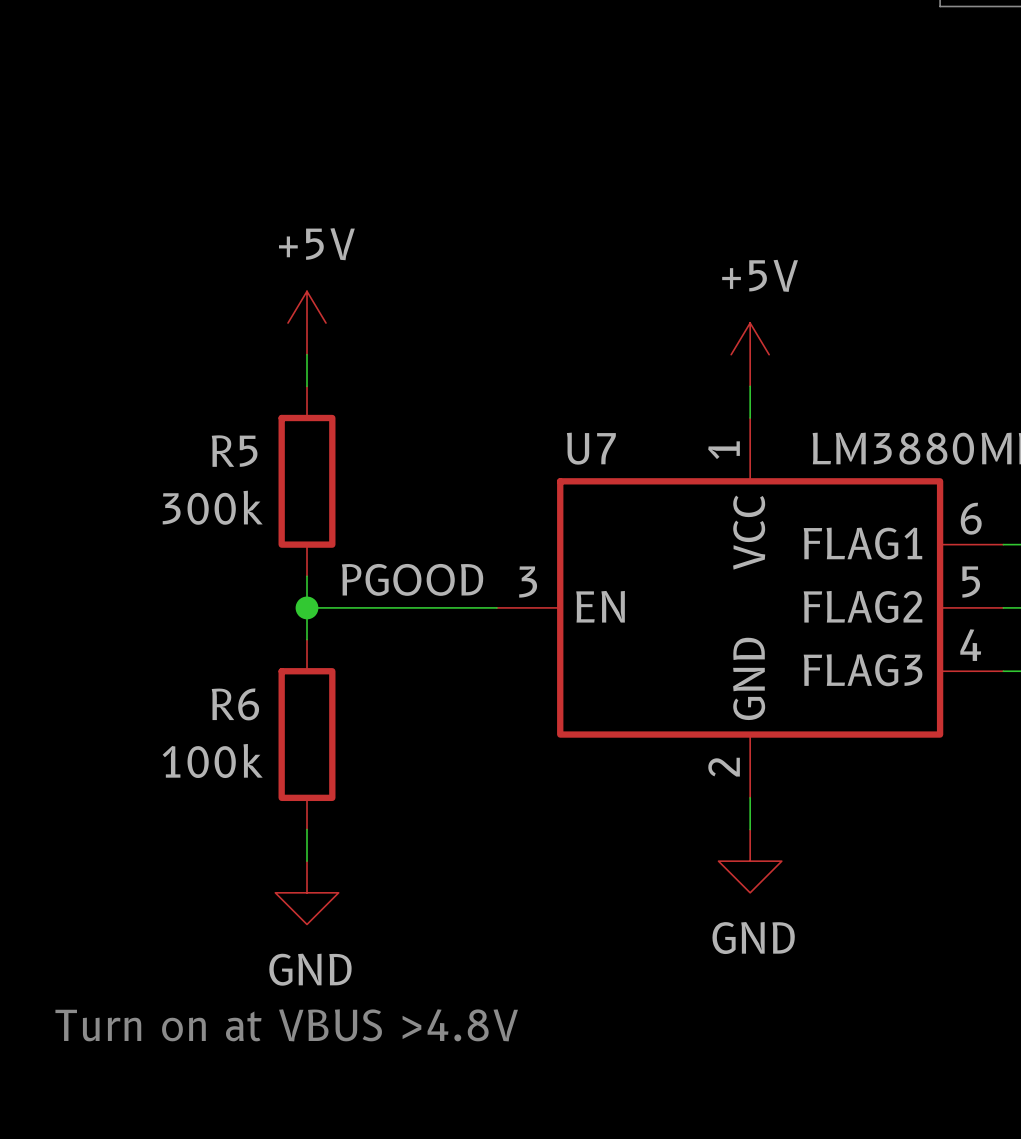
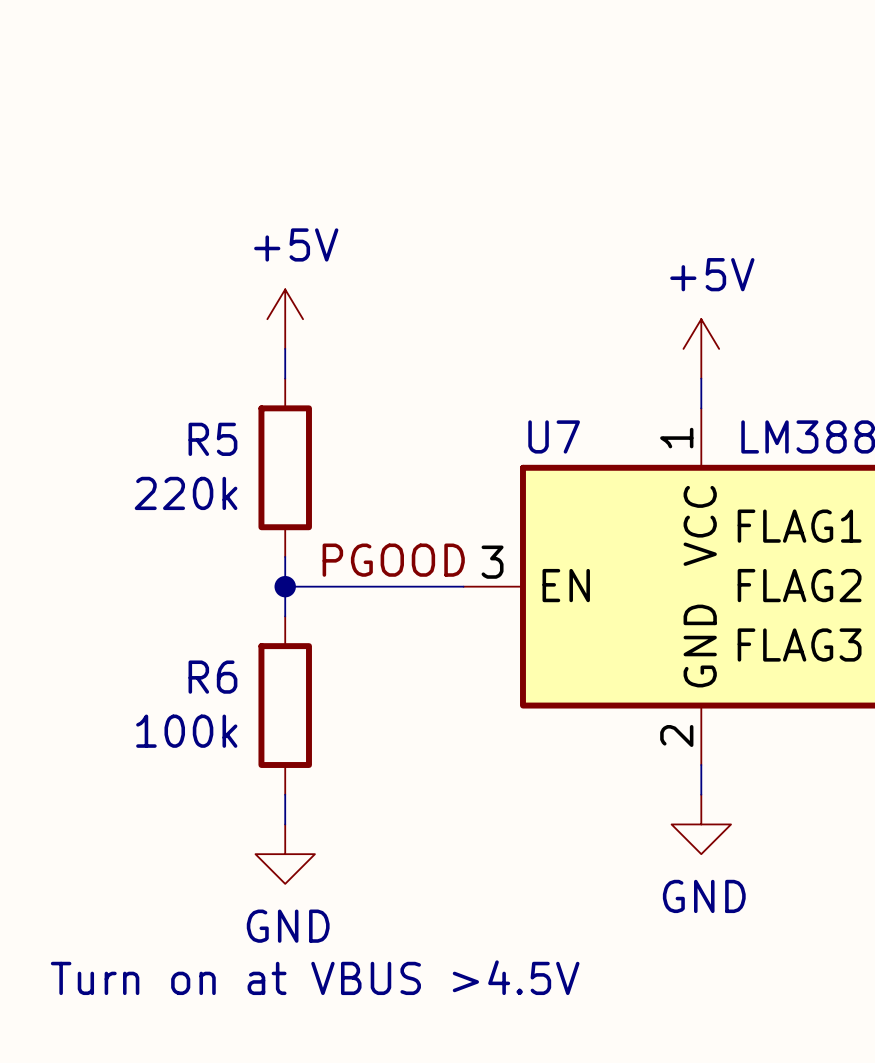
R5 value: 300k (212, 507) -> 220k (186, 493)
text: Turn on at VBUS >4.8V (286, 1025) -> Turn on at VBUS >4.5V (315, 977)

